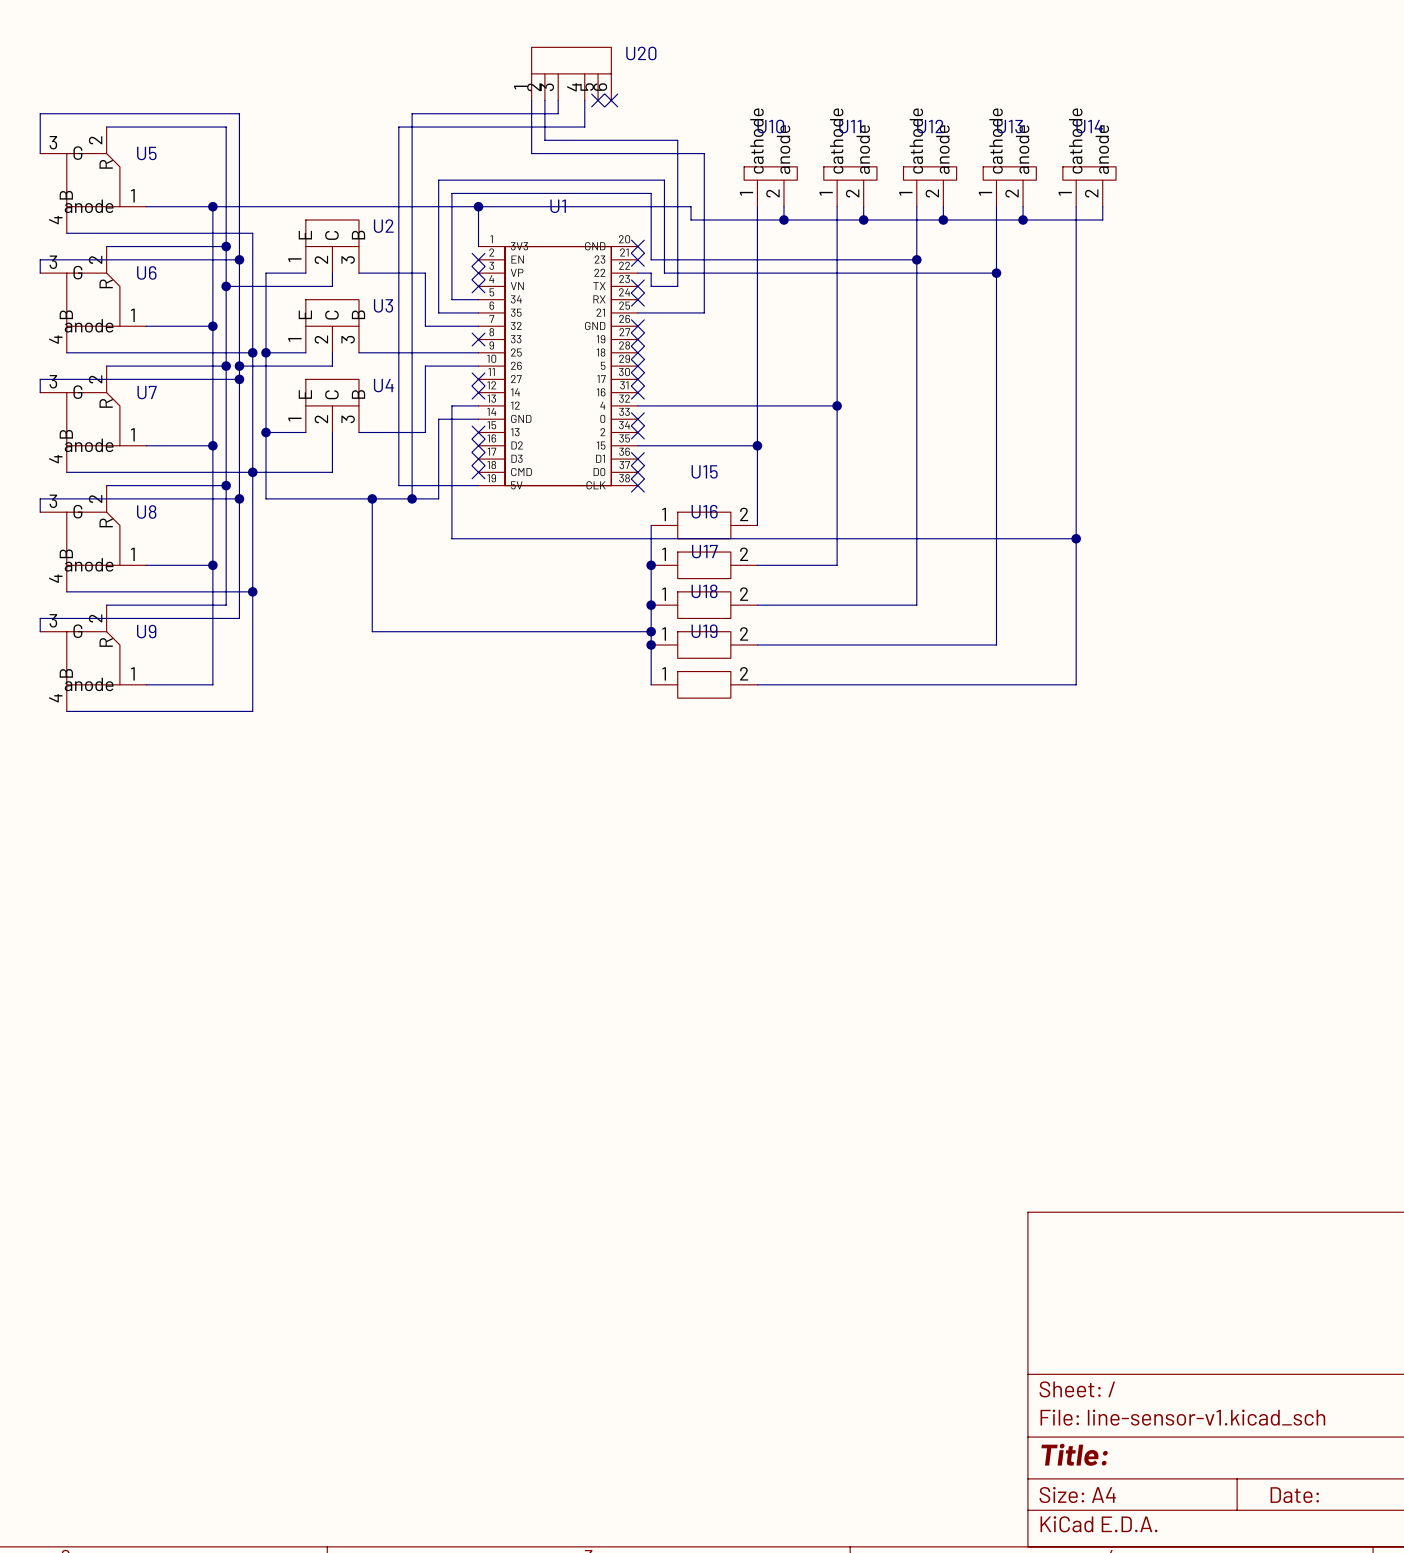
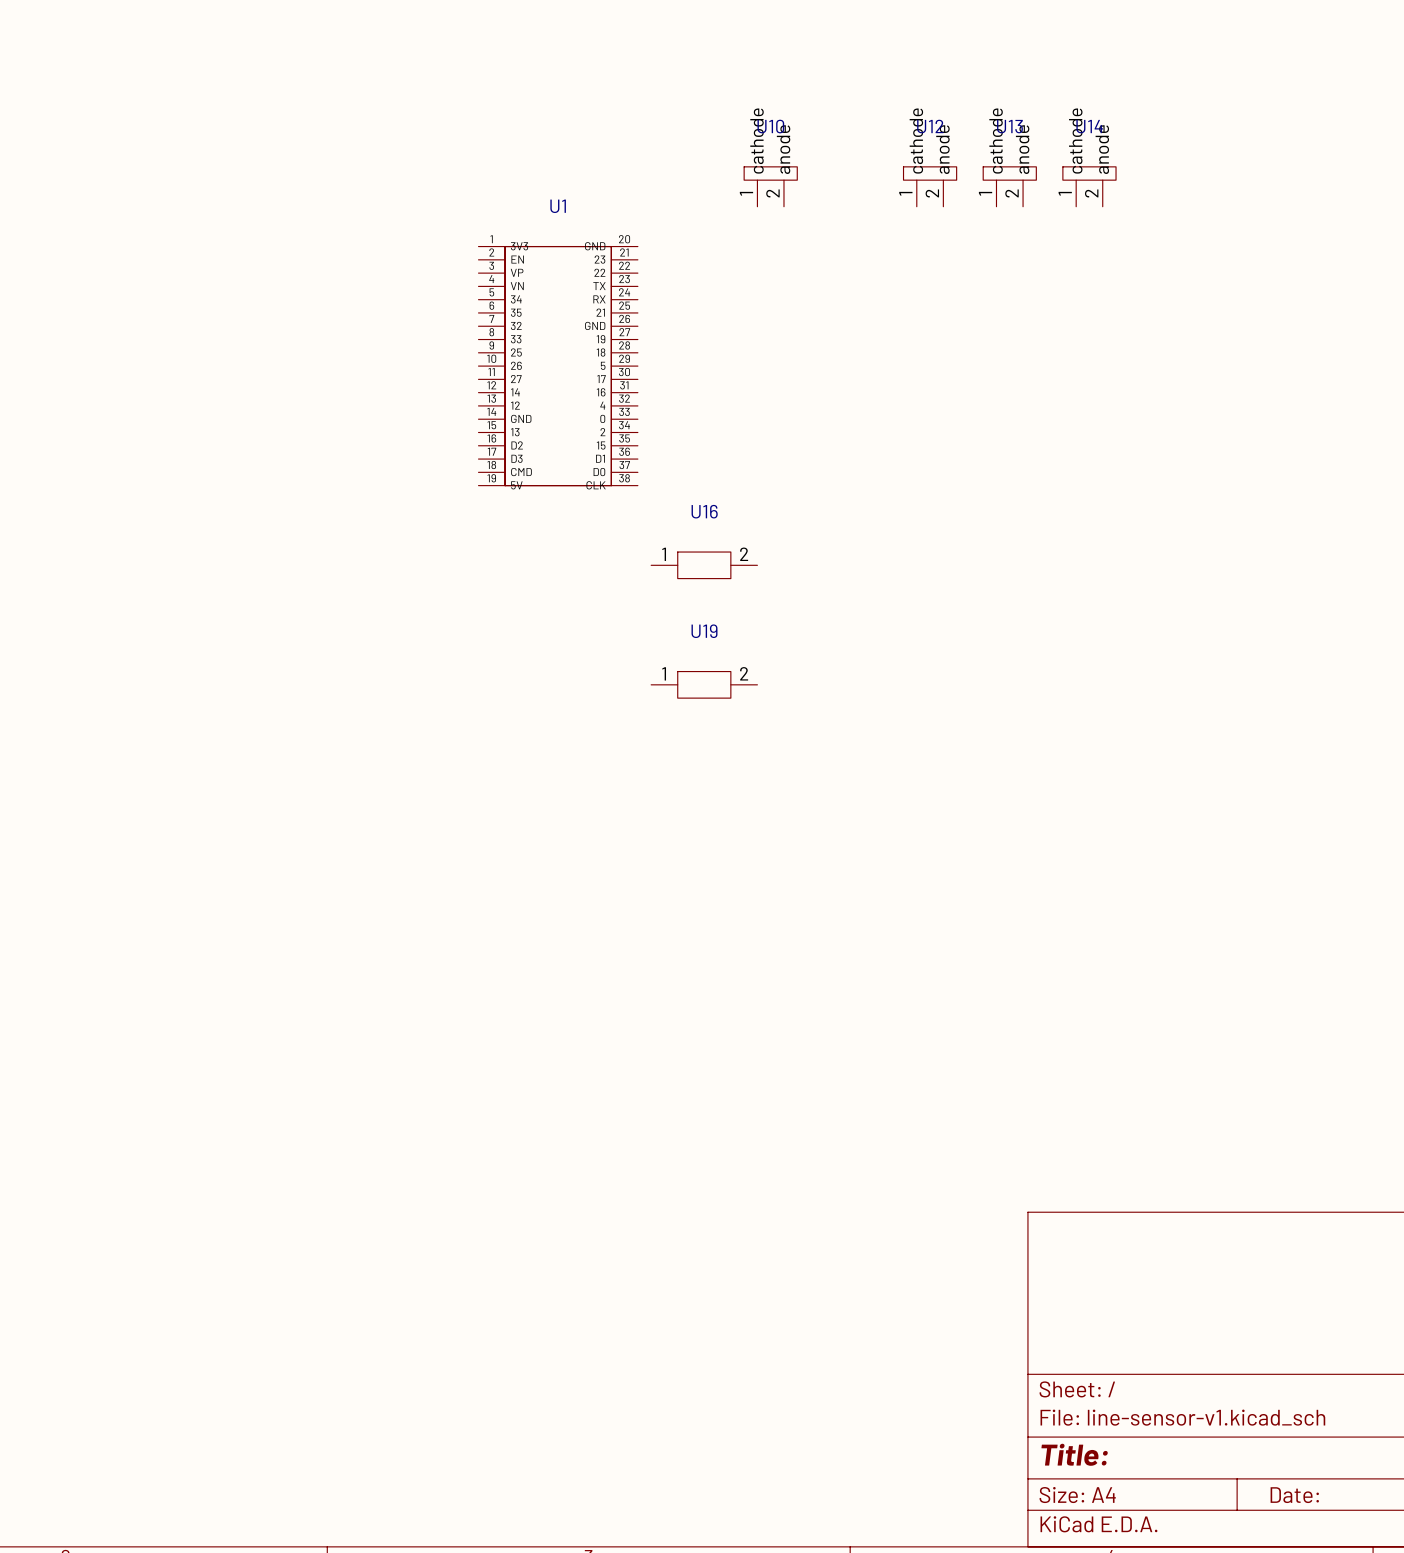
U20: (571, 73) -> none
wire: (531, 100) (531, 153) (704, 153) (704, 312) (637, 312) -> none
wire: (544, 100) (544, 140) (677, 140) (677, 286) (651, 286) (651, 273) (637, 273) -> none
wire: (558, 100) (558, 113) (412, 113) (412, 498) -> none
wire: (584, 100) (584, 127) (398, 127) (398, 485) (478, 485) -> none
no-connect mark: (598, 100) -> none
no-connect mark: (611, 100) -> none
wire: (106, 127) (226, 127) (226, 605) (106, 605) -> none
wire: (40, 153) (40, 113) (239, 113) (239, 618) (40, 618) (40, 631) -> none
U5: (93, 180) -> none
U11: (850, 186) -> none
wire: (146, 206) (691, 206) (691, 219) (1102, 219) (1102, 206) -> none
wire: (212, 206) (212, 684) (146, 684) -> none
junction: (212, 206) -> none
wire: (478, 206) (478, 246) -> none
junction: (478, 206) -> none
wire: (757, 206) (757, 525) -> none
wire: (783, 206) (783, 219) -> none
wire: (837, 206) (837, 565) (757, 565) -> none
wire: (863, 206) (863, 219) -> none
wire: (916, 206) (916, 605) (757, 605) -> none
wire: (943, 206) (943, 219) -> none
wire: (996, 206) (996, 644) (757, 644) -> none
wire: (1023, 206) (1023, 219) -> none
wire: (1076, 206) (1076, 684) (757, 684) -> none
junction: (783, 219) -> none
junction: (863, 219) -> none
junction: (943, 219) -> none
junction: (1023, 219) -> none
wire: (66, 233) (252, 233) (252, 711) (66, 711) -> none
wire: (106, 246) (226, 246) -> none
junction: (226, 246) -> none
U2: (332, 246) -> none
no-connect mark: (637, 246) -> none
wire: (239, 259) (40, 259) (40, 273) -> none
junction: (239, 259) -> none
no-connect mark: (478, 259) -> none
no-connect mark: (637, 259) -> none
wire: (916, 259) (651, 259) (651, 193) (451, 193) (451, 299) (478, 299) -> none
junction: (916, 259) -> none
wire: (305, 273) (266, 273) (266, 498) (438, 498) (438, 419) (478, 419) -> none
wire: (332, 273) (332, 286) (226, 286) -> none
wire: (358, 273) (425, 273) (425, 326) (478, 326) -> none
no-connect mark: (478, 273) -> none
wire: (996, 273) (664, 273) (664, 180) (438, 180) (438, 312) (478, 312) -> none
junction: (996, 273) -> none
junction: (226, 286) -> none
no-connect mark: (478, 286) -> none
no-connect mark: (637, 286) -> none
U6: (93, 299) -> none
no-connect mark: (637, 299) -> none
wire: (146, 326) (212, 326) -> none
junction: (212, 326) -> none
U3: (332, 326) -> none
no-connect mark: (637, 326) -> none
no-connect mark: (478, 339) -> none
no-connect mark: (637, 339) -> none
wire: (66, 352) (252, 352) -> none
junction: (252, 352) -> none
wire: (266, 352) (305, 352) -> none
junction: (266, 352) -> none
wire: (332, 352) (332, 366) (239, 366) -> none
wire: (358, 352) (478, 352) -> none
no-connect mark: (637, 352) -> none
wire: (106, 366) (226, 366) -> none
junction: (226, 366) -> none
junction: (239, 366) -> none
wire: (478, 366) (425, 366) (425, 432) (358, 432) -> none
no-connect mark: (637, 366) -> none
wire: (239, 379) (40, 379) (40, 392) -> none
junction: (239, 379) -> none
no-connect mark: (478, 379) -> none
no-connect mark: (637, 379) -> none
no-connect mark: (478, 392) -> none
no-connect mark: (637, 392) -> none
U4: (332, 405) -> none
wire: (478, 405) (451, 405) (451, 538) (1076, 538) -> none
wire: (637, 405) (837, 405) -> none
junction: (837, 405) -> none
U7: (93, 419) -> none
no-connect mark: (637, 419) -> none
wire: (266, 432) (305, 432) -> none
junction: (266, 432) -> none
wire: (332, 432) (332, 472) (66, 472) -> none
no-connect mark: (478, 432) -> none
no-connect mark: (637, 432) -> none
wire: (146, 445) (212, 445) -> none
junction: (212, 445) -> none
no-connect mark: (478, 445) -> none
wire: (637, 445) (757, 445) -> none
junction: (757, 445) -> none
no-connect mark: (478, 459) -> none
no-connect mark: (637, 459) -> none
junction: (252, 472) -> none
no-connect mark: (478, 472) -> none
no-connect mark: (637, 472) -> none
wire: (106, 485) (226, 485) -> none
junction: (226, 485) -> none
no-connect mark: (637, 485) -> none
wire: (239, 498) (40, 498) (40, 512) -> none
junction: (239, 498) -> none
wire: (372, 498) (372, 631) (651, 631) -> none
junction: (372, 498) -> none
junction: (412, 498) -> none
wire: (651, 525) (651, 684) -> none
U15: (704, 525) -> none
U8: (93, 538) -> none
junction: (1076, 538) -> none
wire: (146, 565) (212, 565) -> none
junction: (212, 565) -> none
junction: (651, 565) -> none
wire: (66, 591) (252, 591) -> none
junction: (252, 591) -> none
junction: (651, 605) -> none
U17: (704, 605) -> none
junction: (651, 631) -> none
junction: (651, 644) -> none
U18: (704, 644) -> none
U9: (93, 658) -> none

